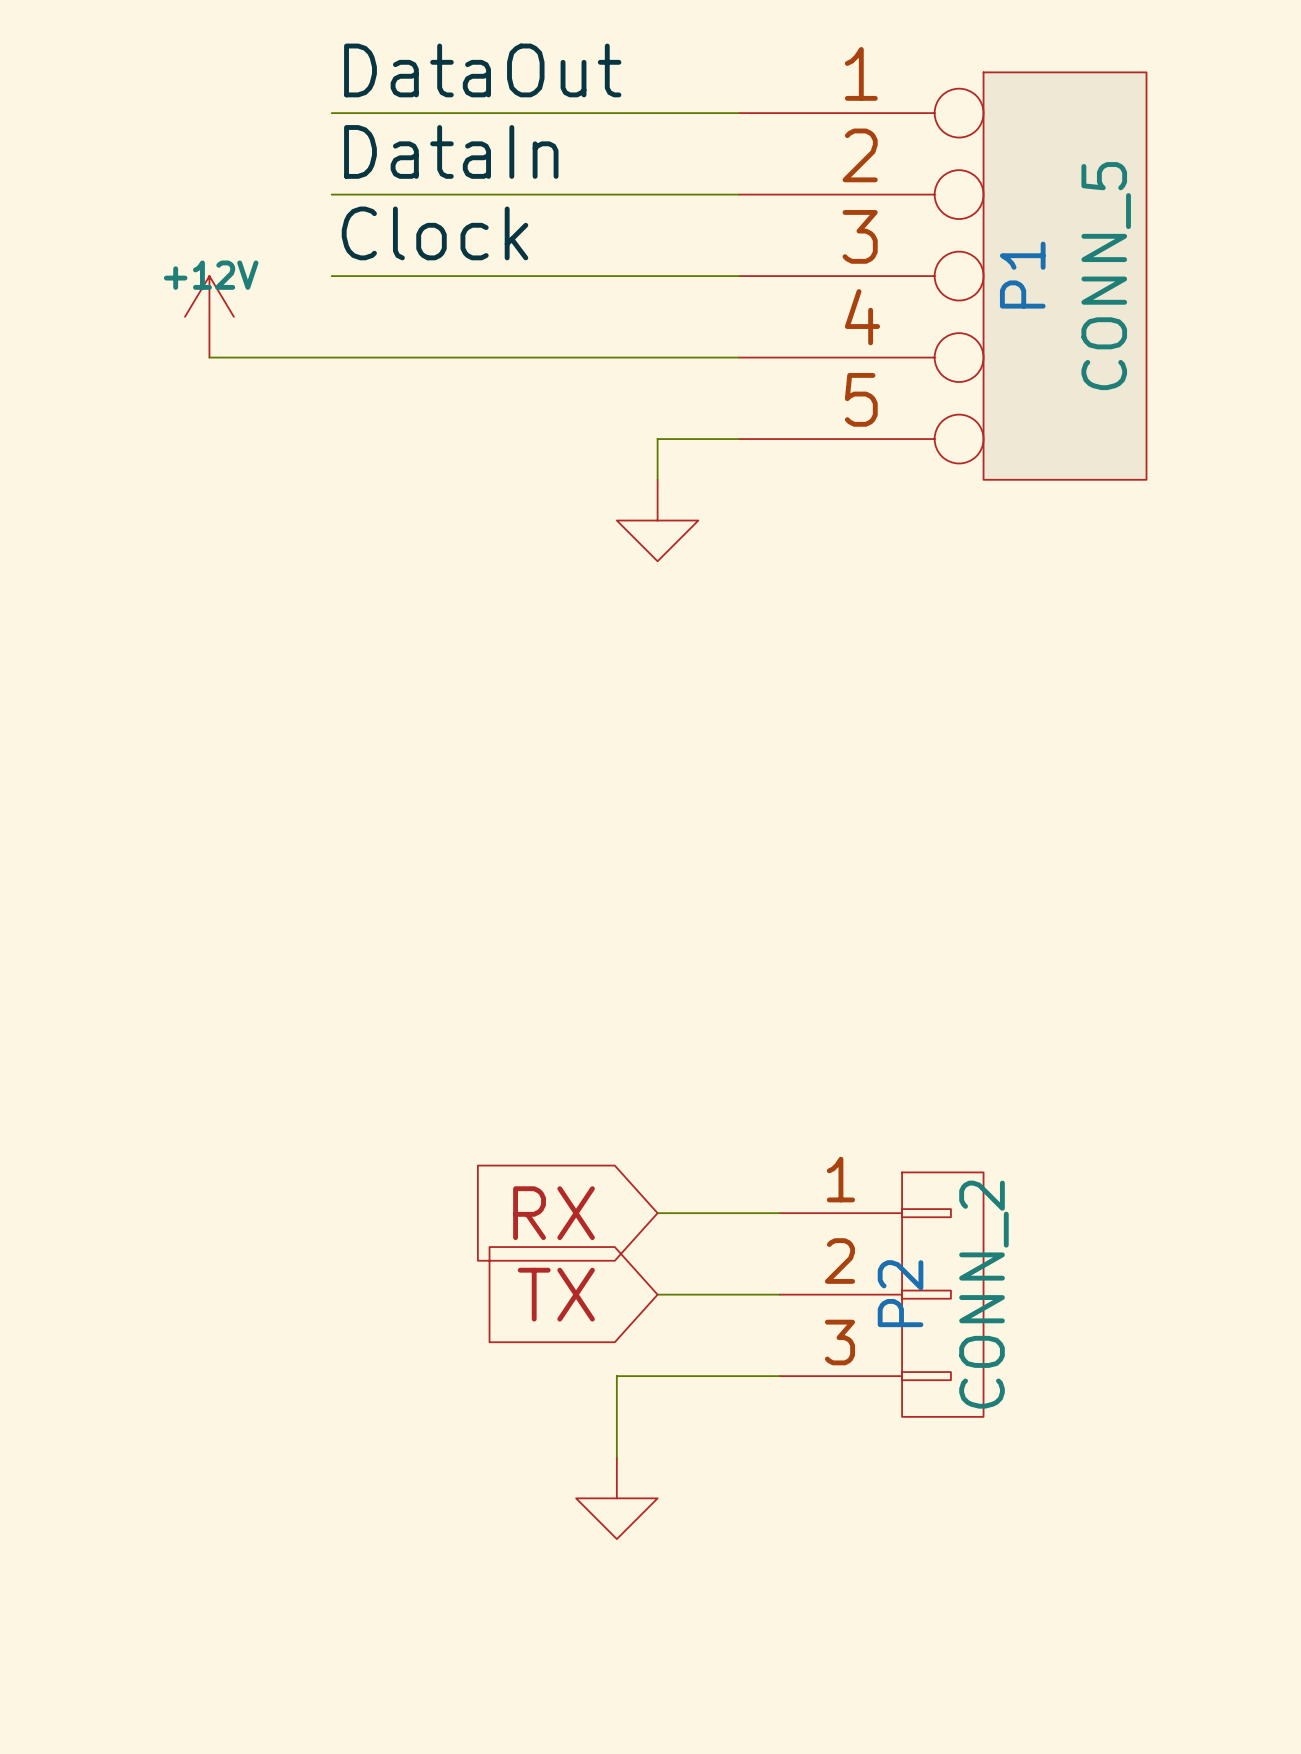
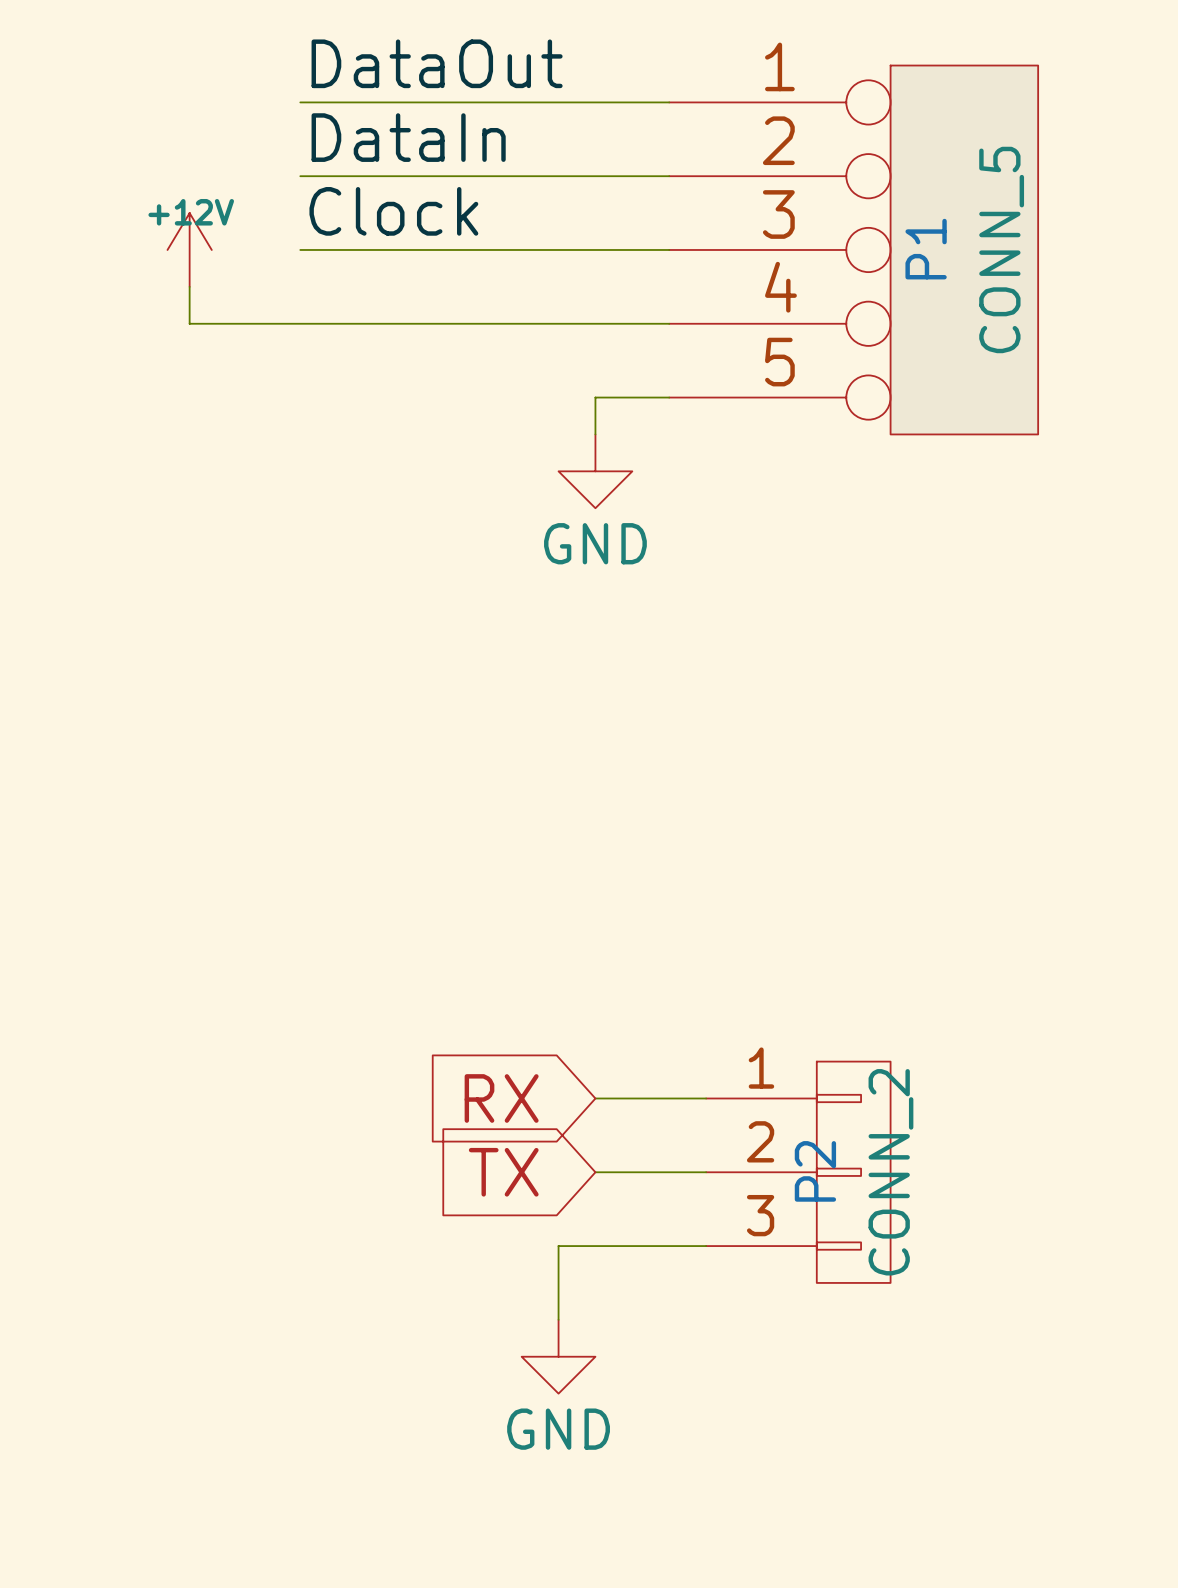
power symbol position: +12V (209, 316) -> +12V (189, 249)
power symbol text: none -> GND (595, 543)
power symbol text: none -> GND (558, 1429)

